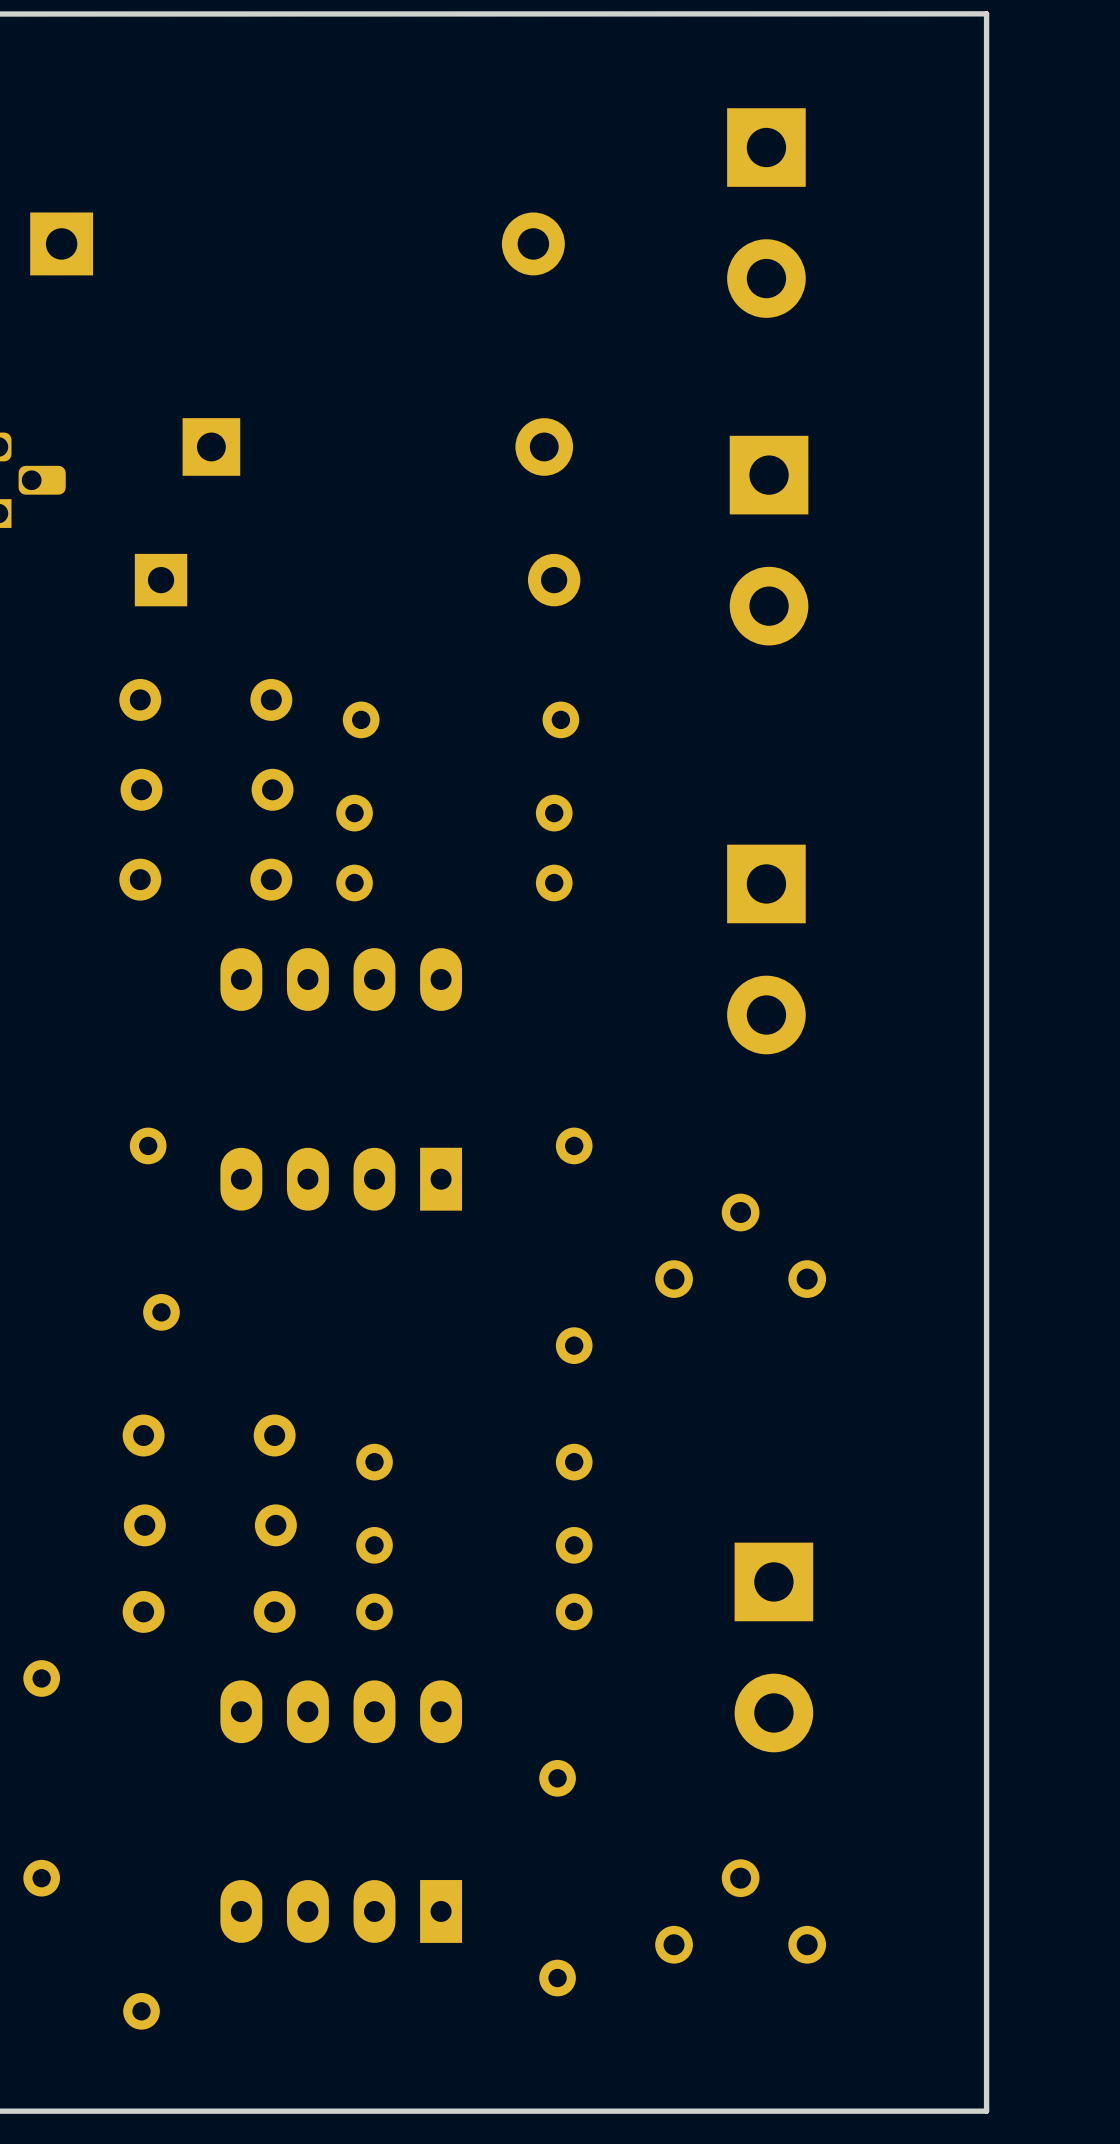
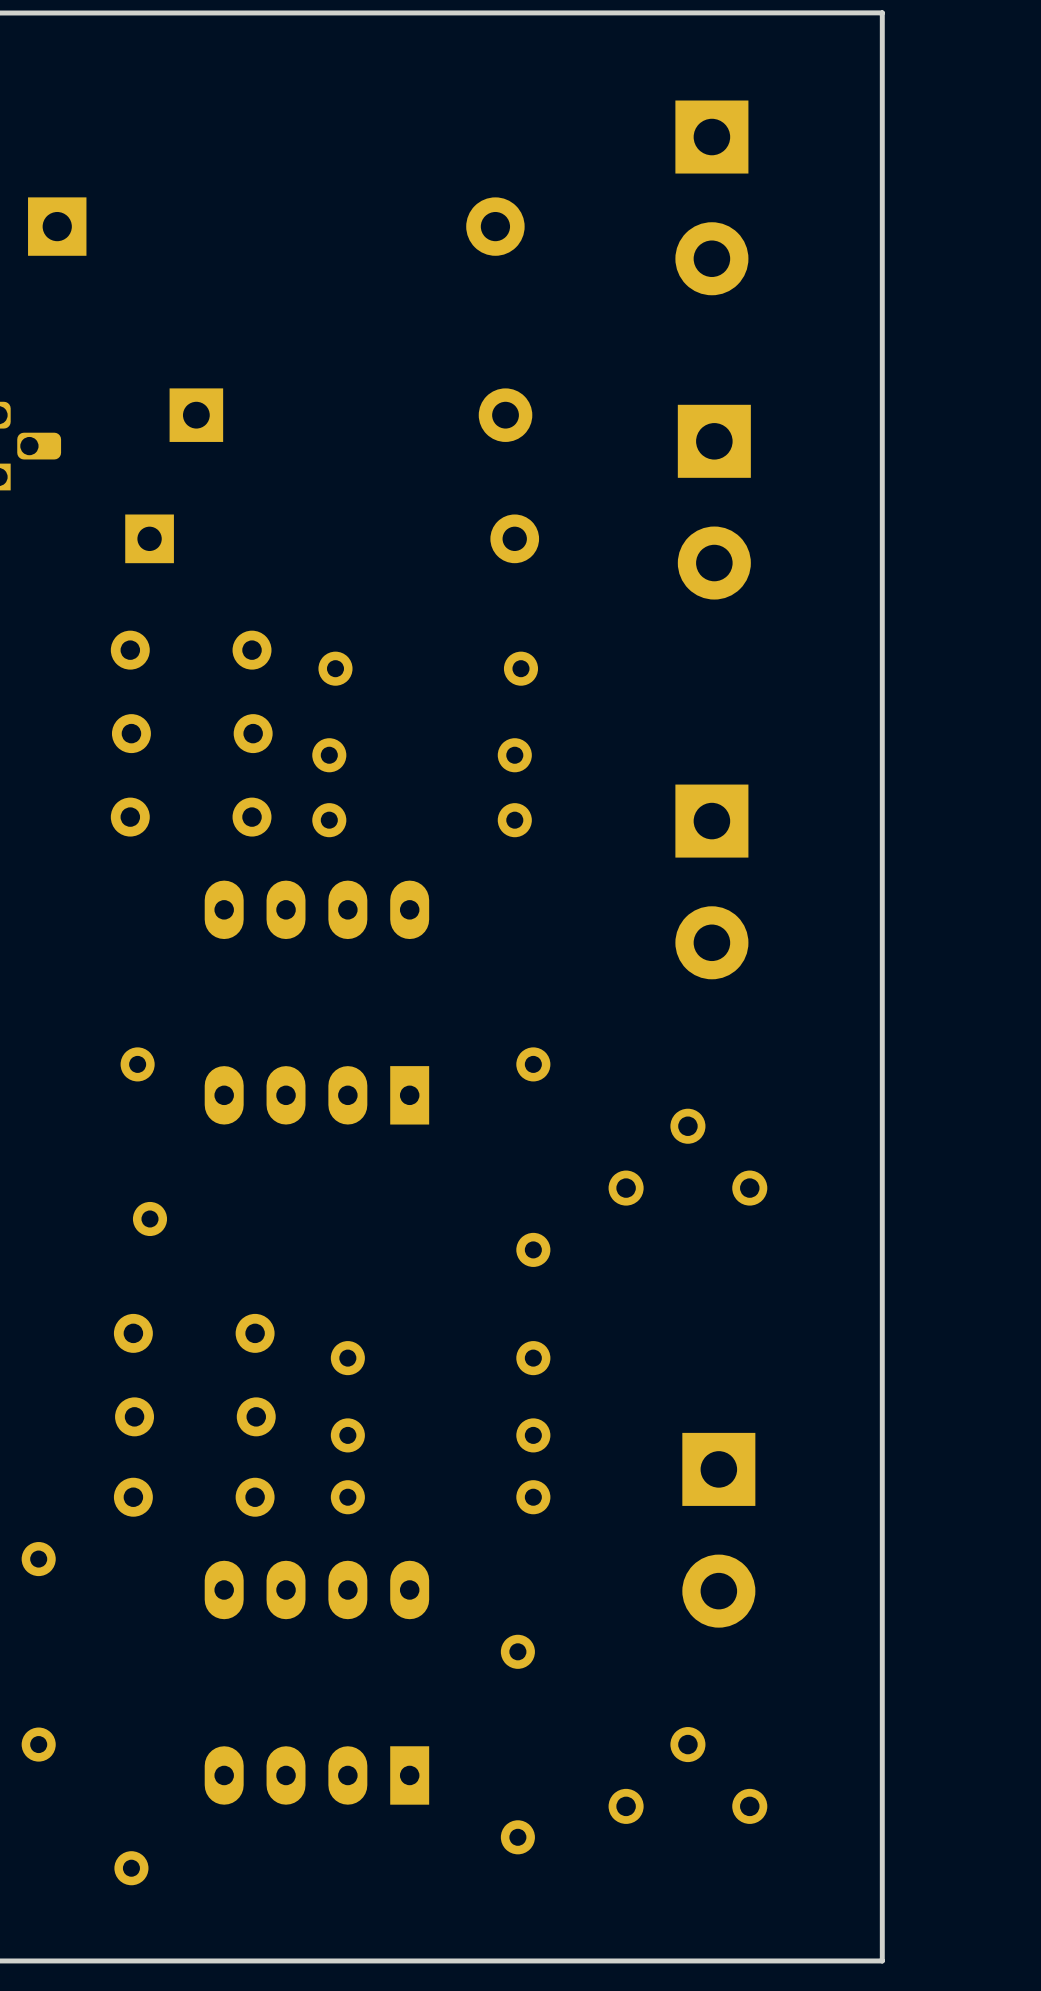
board edge: (949, 13) (986, 13) (986, 2111) (949, 2111) -> (882, 12) (882, 1960)

